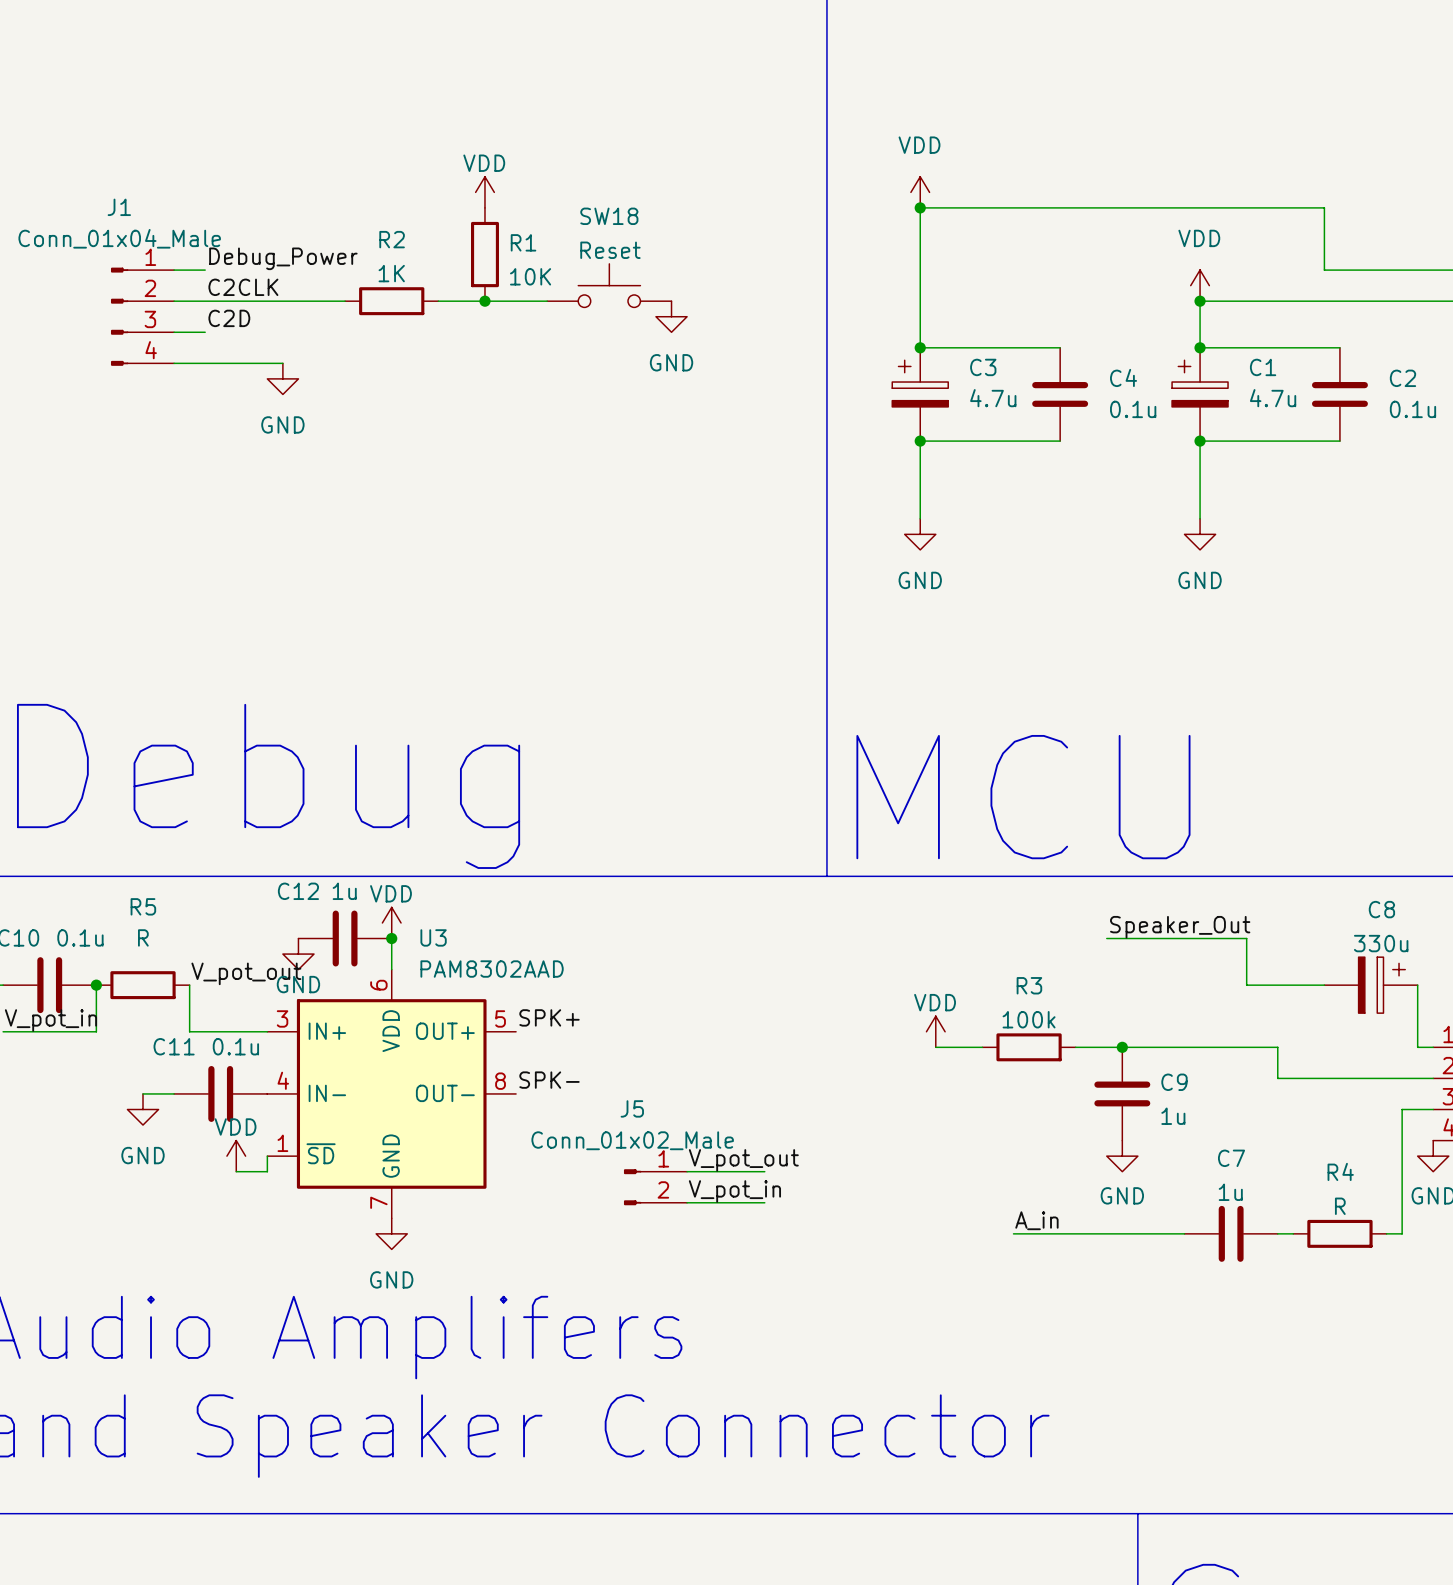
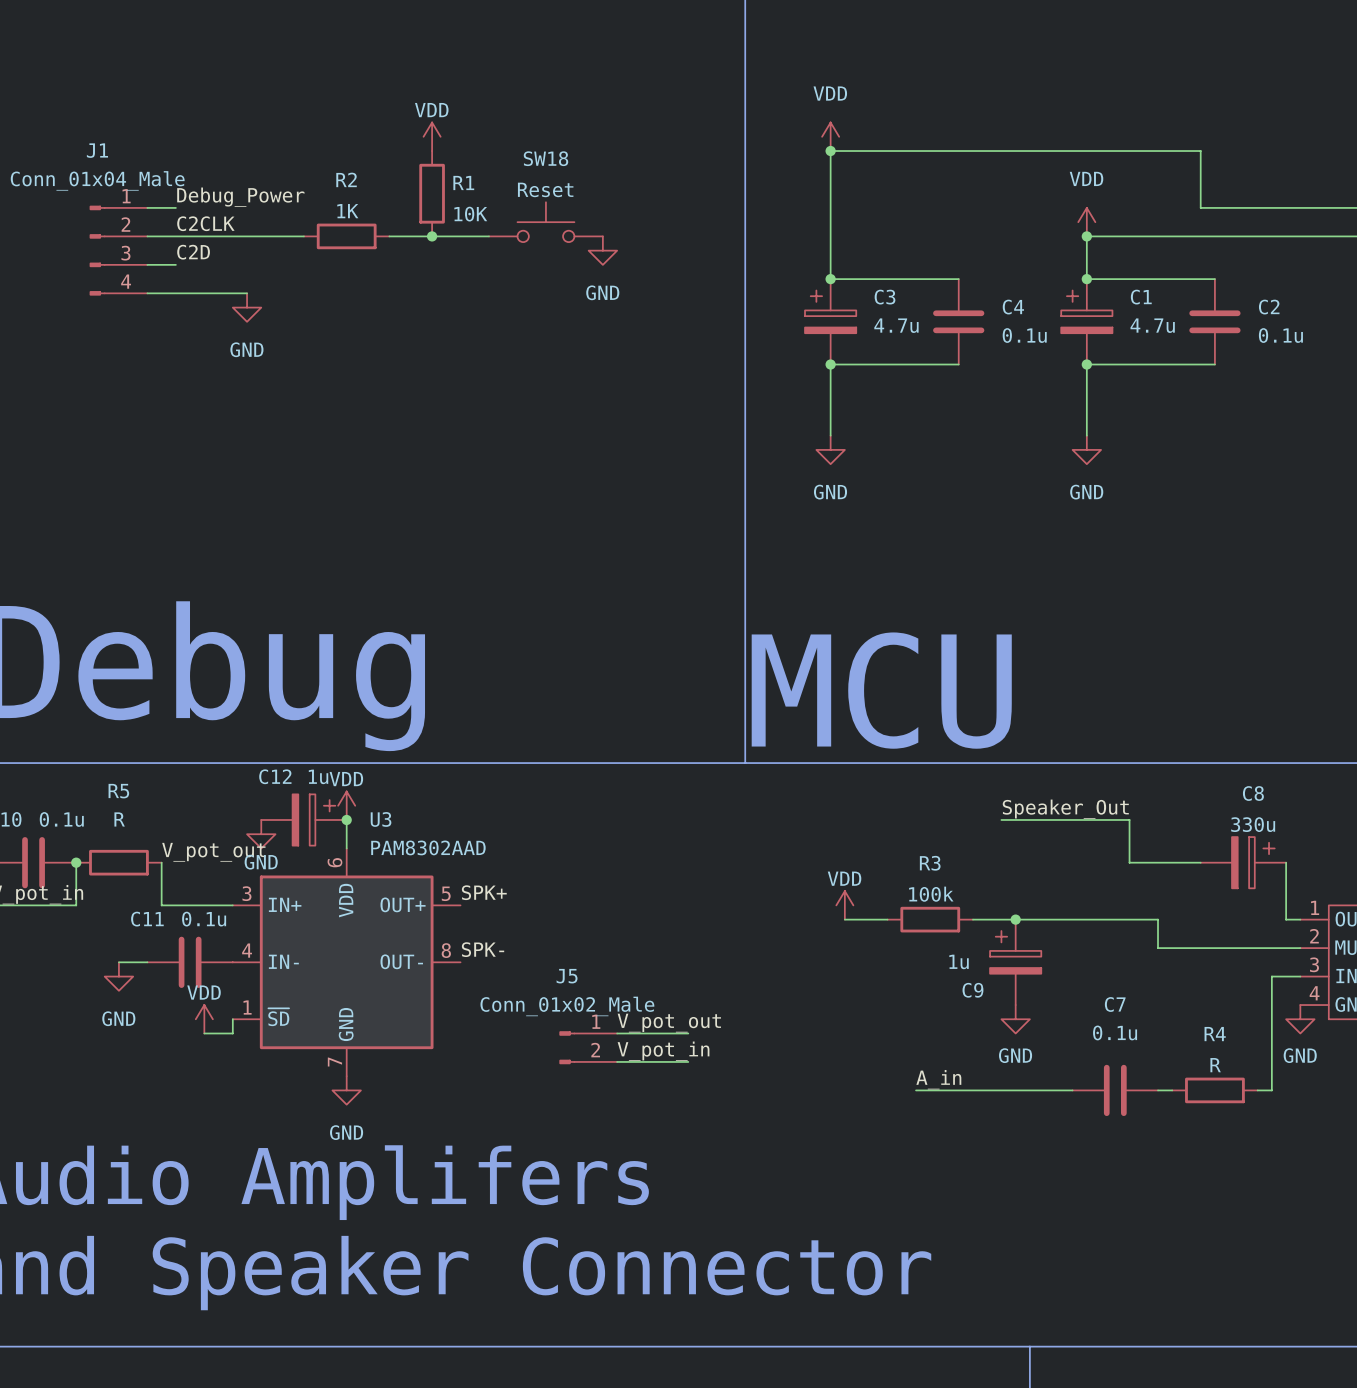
C12 symbol: [298, 910, 392, 967] -> [261, 794, 347, 846]
C9 symbol: [1094, 1047, 1151, 1141] -> [990, 919, 1042, 1006]
C9 name position: C9 (1174, 1082) -> C9 (972, 990)
C9 value position: 1u (1173, 1116) -> 1u (959, 961)
C7 name position: C7 (1231, 1158) -> C7 (1115, 1004)
C7 value: 1u (1230, 1192) -> 0.1u (1115, 1032)

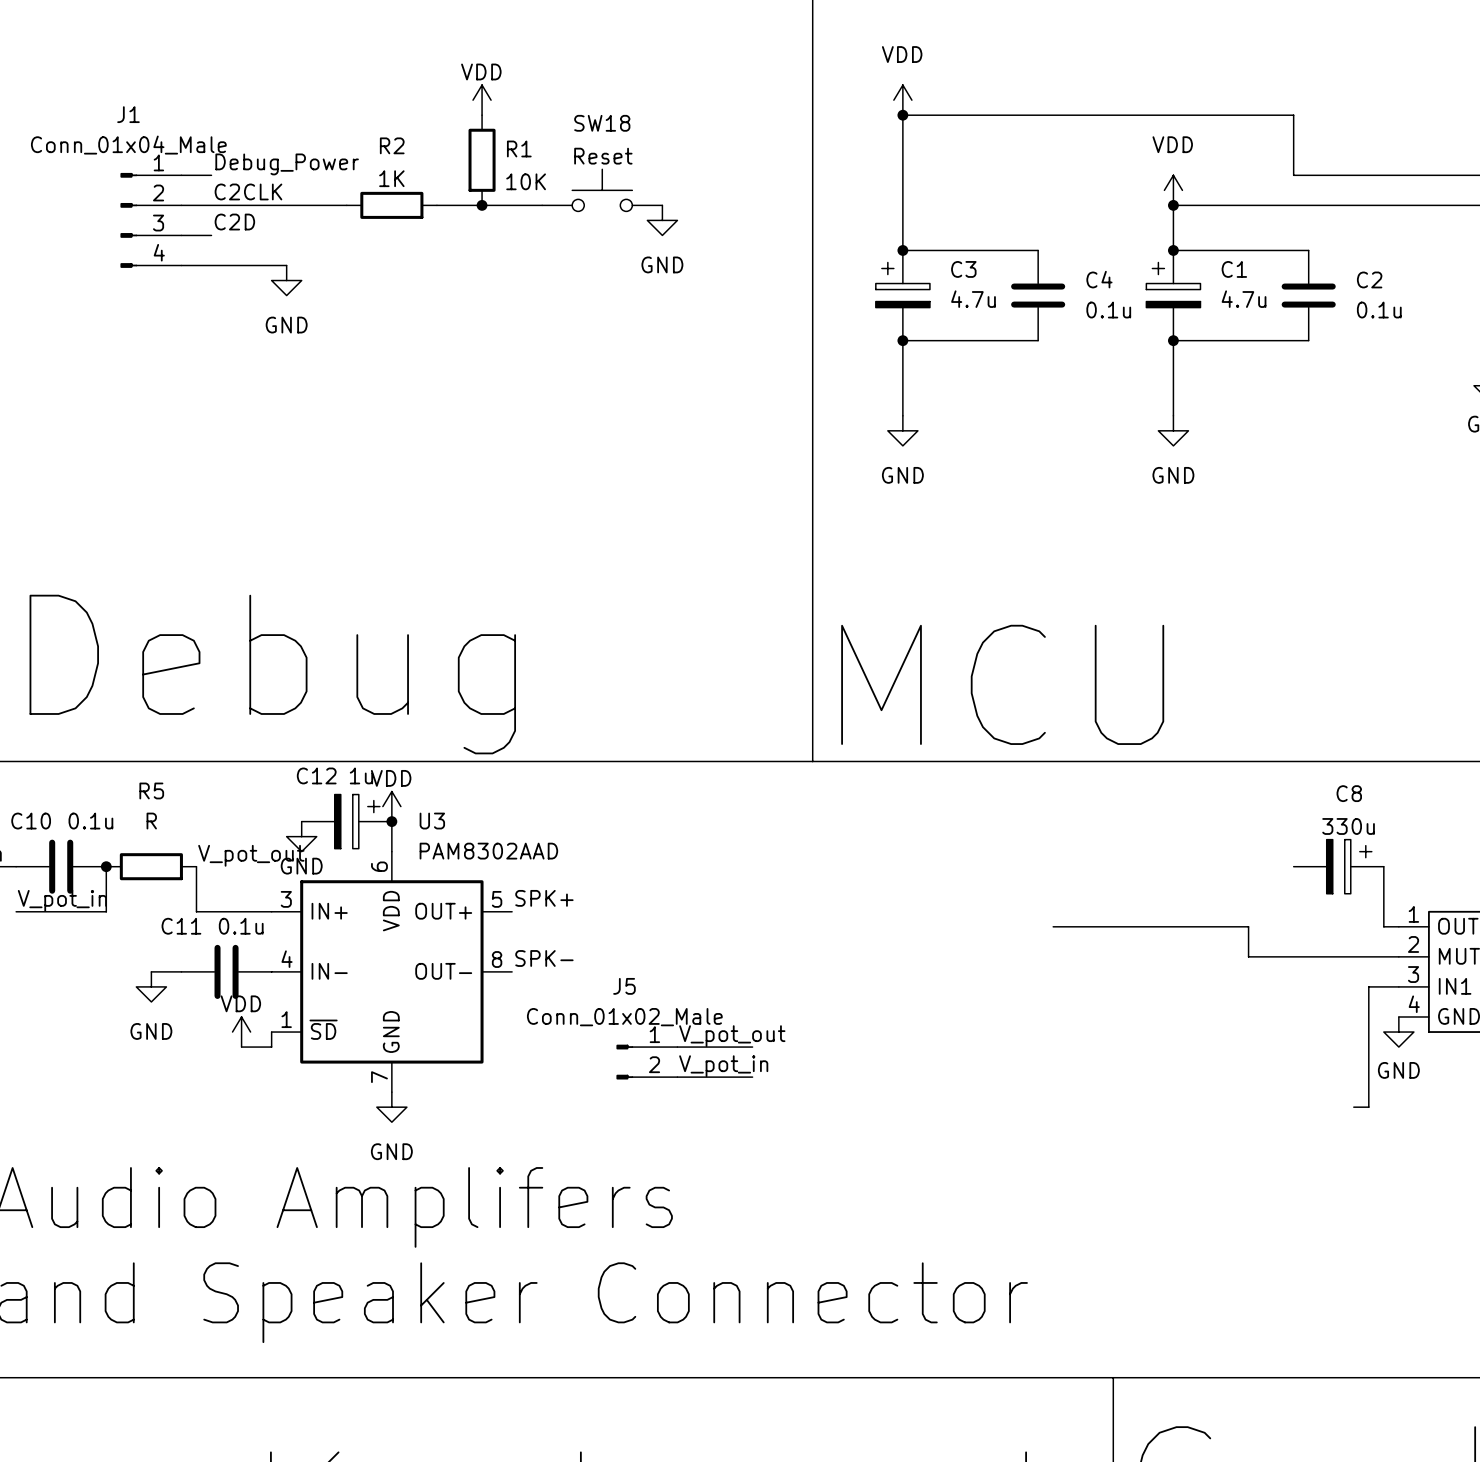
label: Speaker_Out (1065, 809) -> none
wire: (1001, 819) (1129, 819) (1129, 862) (1200, 862) -> none
power symbol: VDD (844, 905) -> none
wire: (844, 919) (887, 919) -> none
R3: 100k (930, 919) -> none
junction: (1015, 919) -> none
C9: 1u (1015, 962) -> none
power symbol: GND (1015, 1019) -> none
label: A_in (938, 1079) -> none
wire: (916, 1090) (1072, 1090) -> none
C7: 0.1u (1115, 1090) -> none
wire: (1158, 1090) (1172, 1090) -> none
R4: R (1214, 1090) -> none

